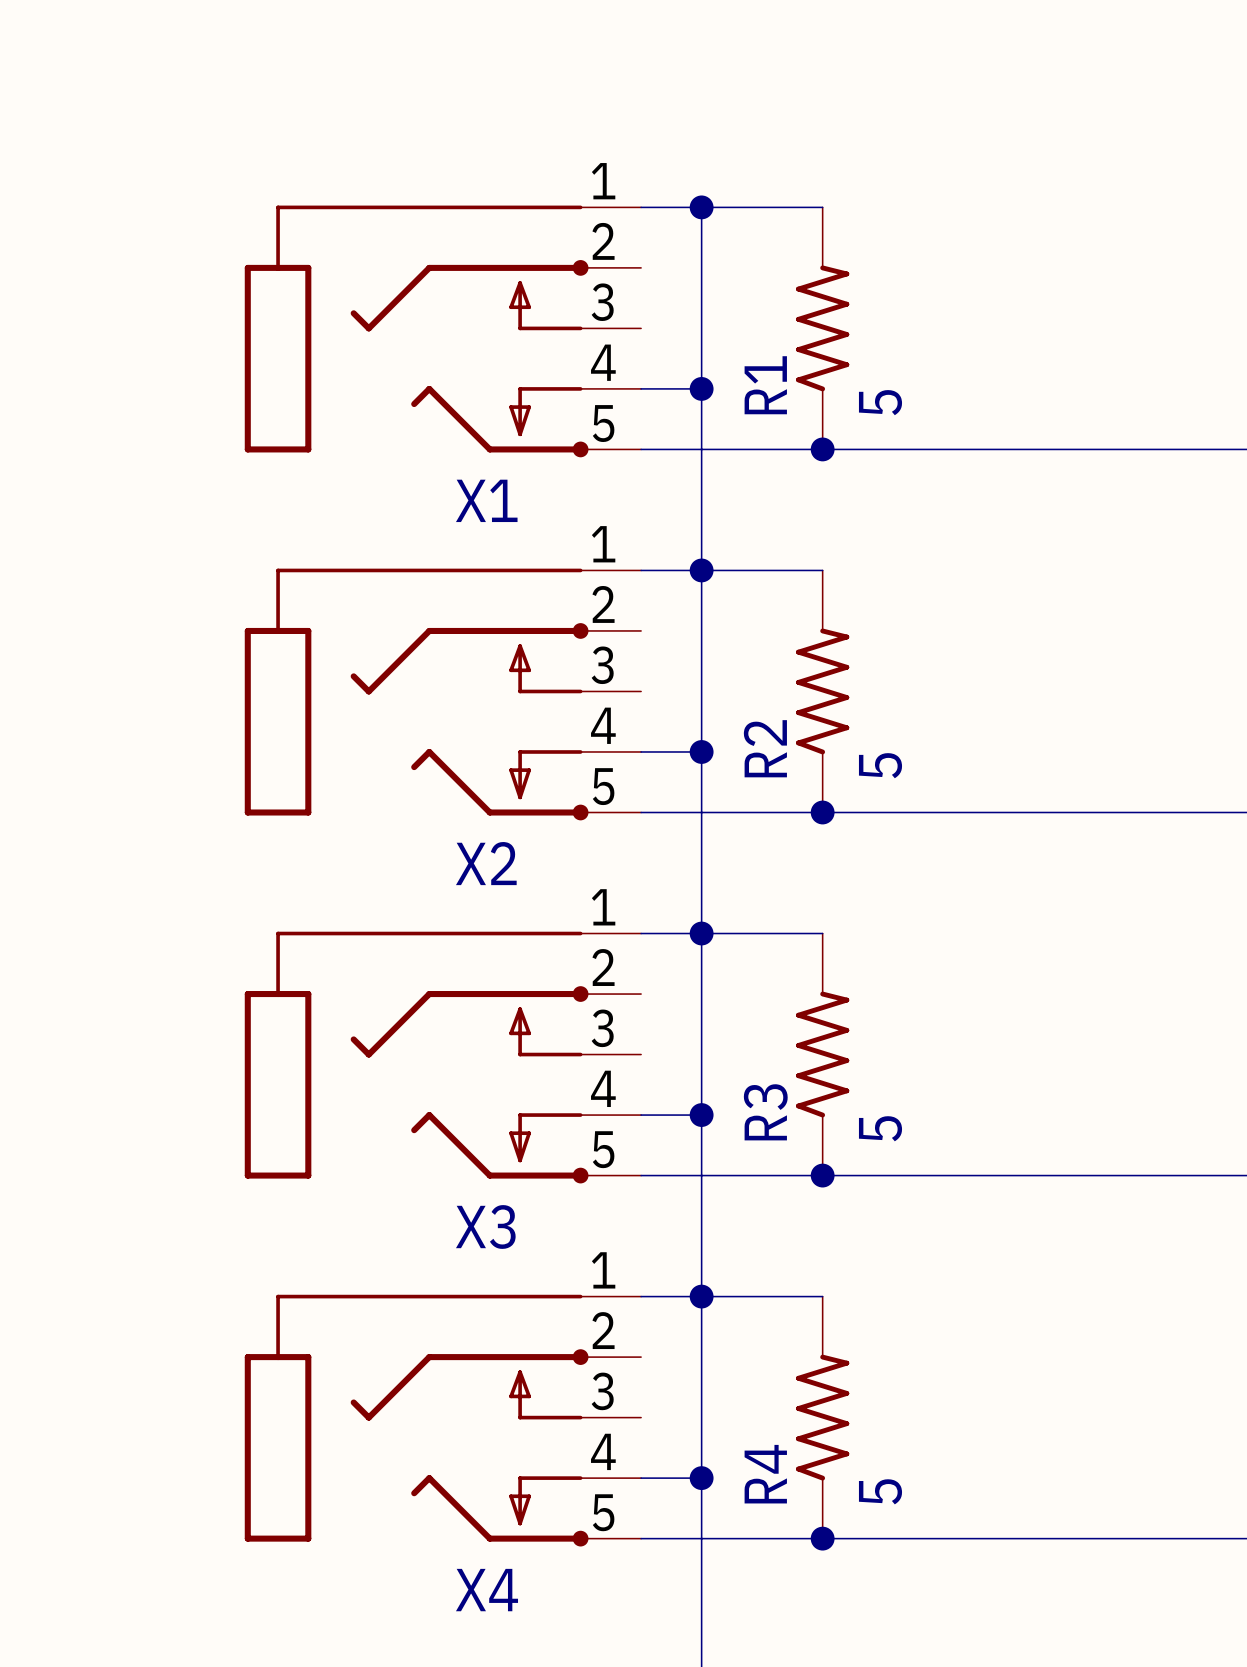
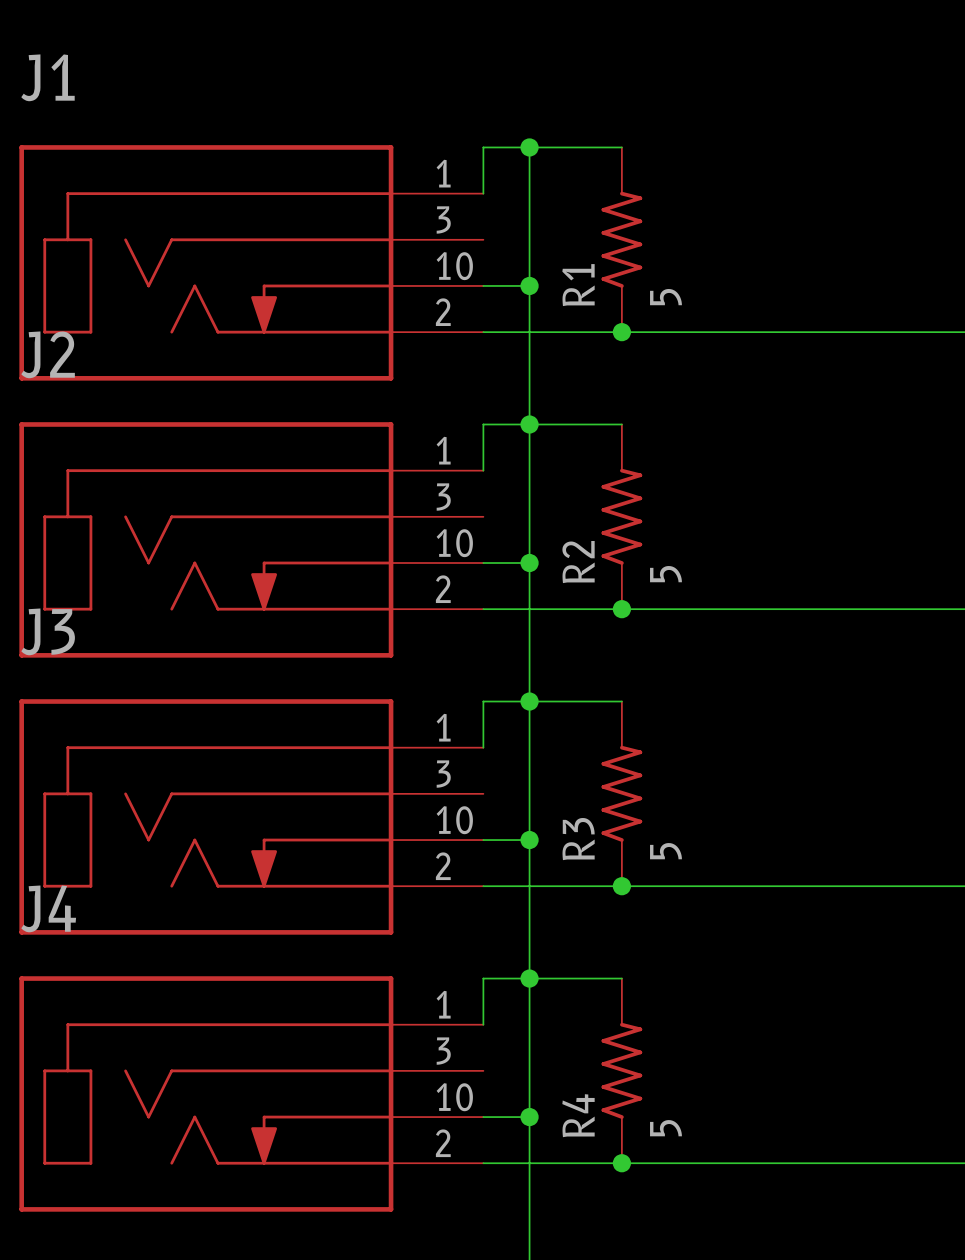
wire: none -> (483, 147) (483, 193)
X1: (442, 331) -> none
J1: none -> (251, 262)
wire: none -> (483, 424) (483, 470)
X2: (442, 694) -> none
J2: none -> (251, 539)
wire: none -> (483, 701) (483, 747)
X3: (442, 1057) -> none
J3: none -> (251, 816)
wire: none -> (483, 978) (483, 1024)
X4: (442, 1420) -> none
J4: none -> (251, 1093)

